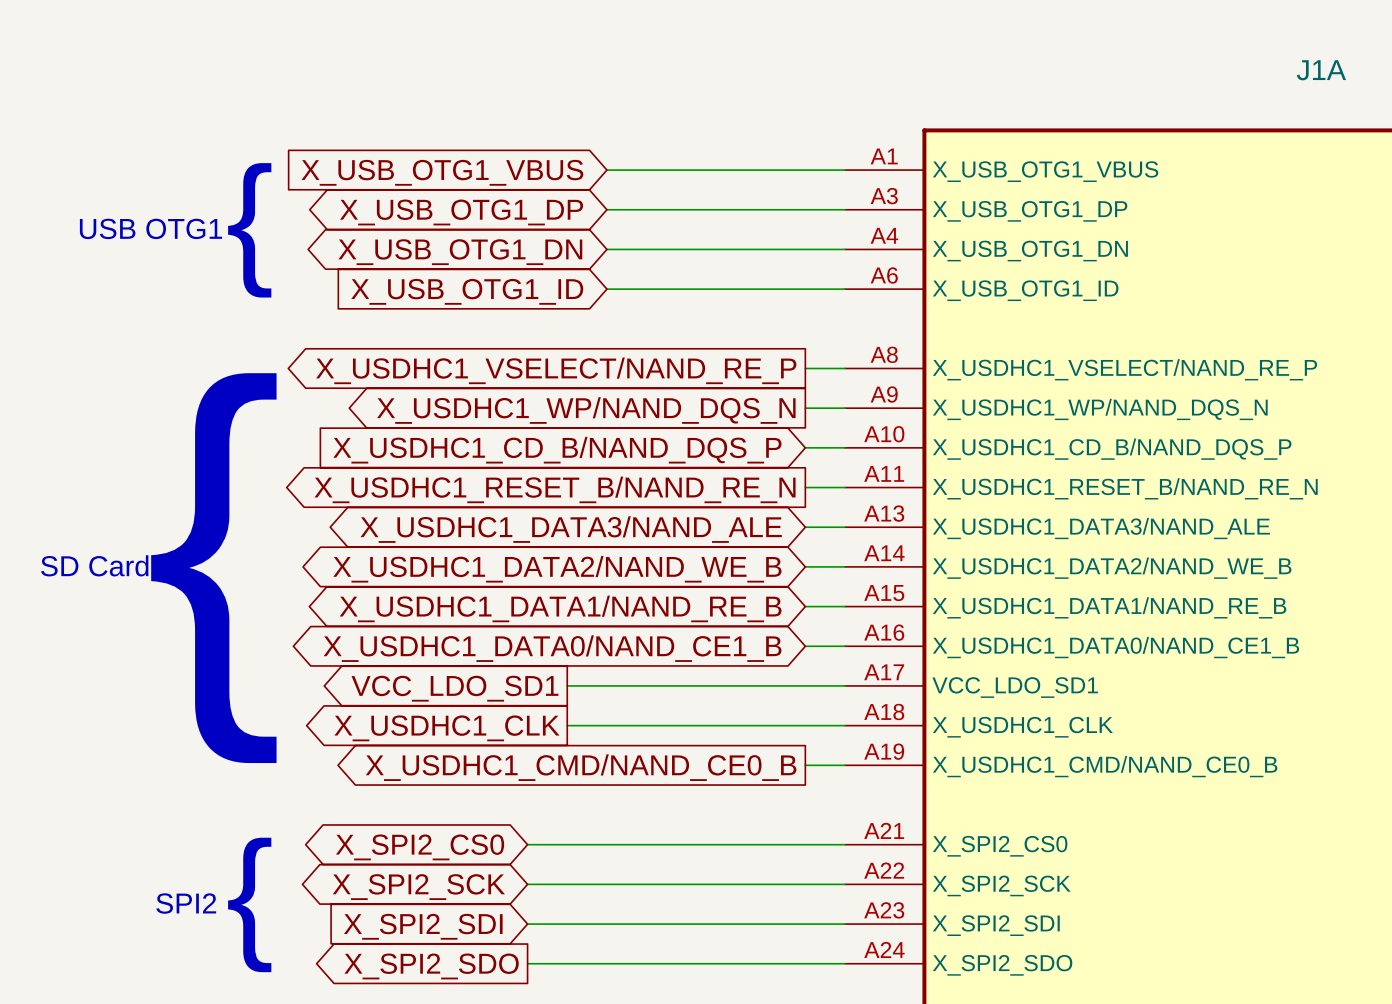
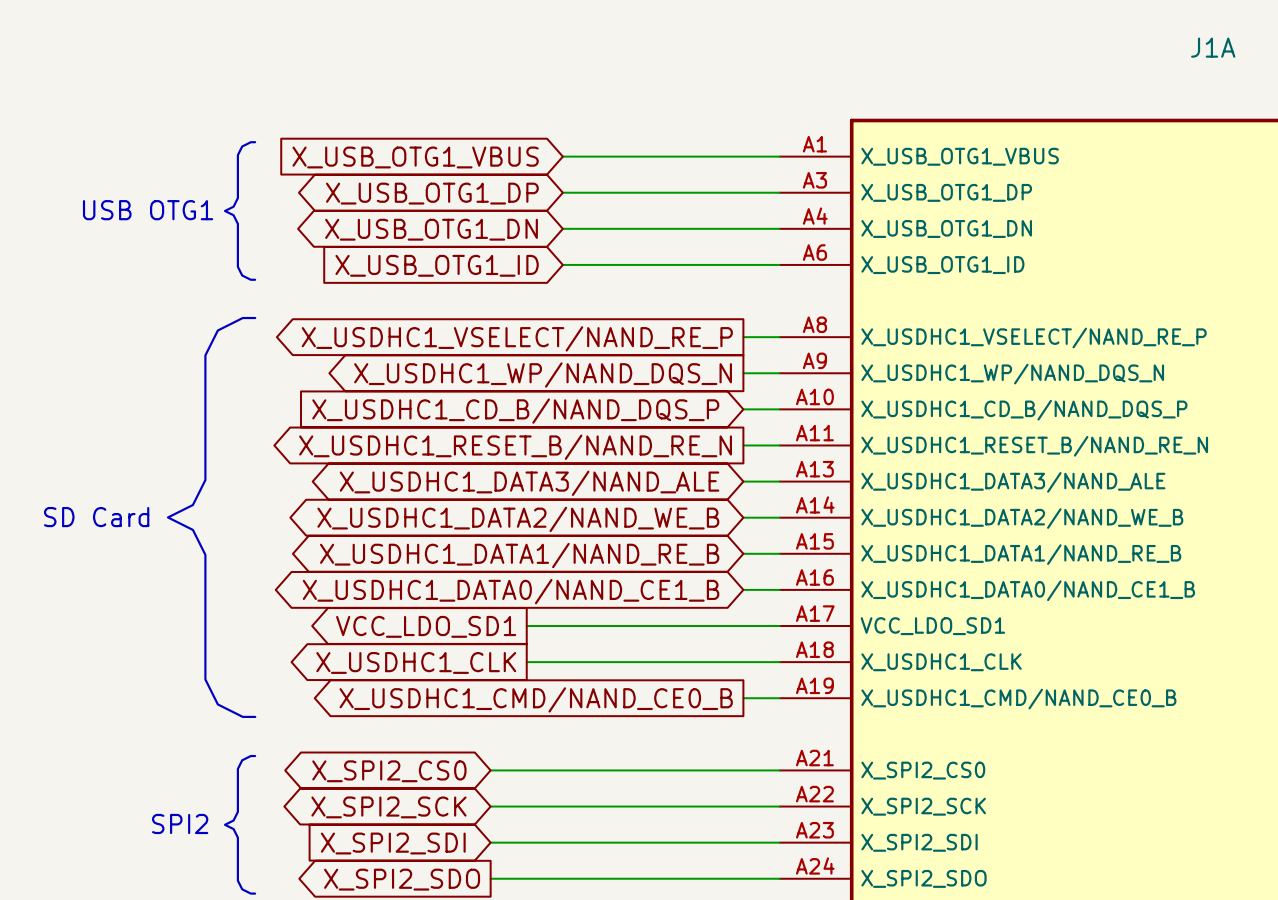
J1A name position: J1A (1321, 70) -> J1A (1213, 47)

